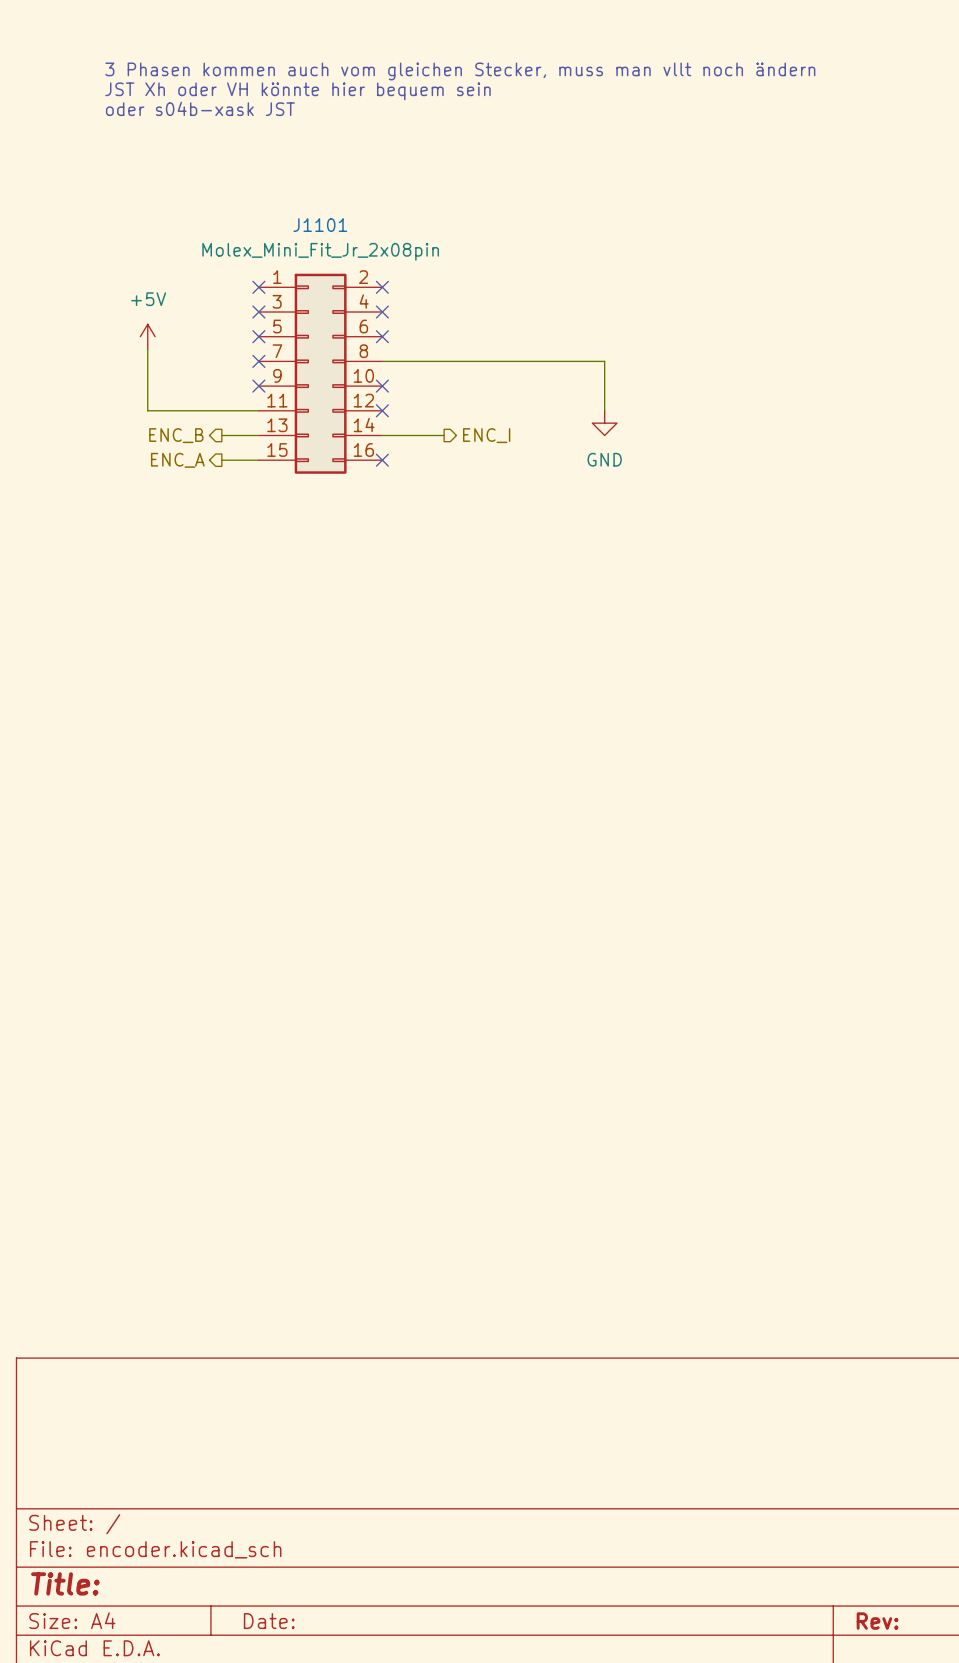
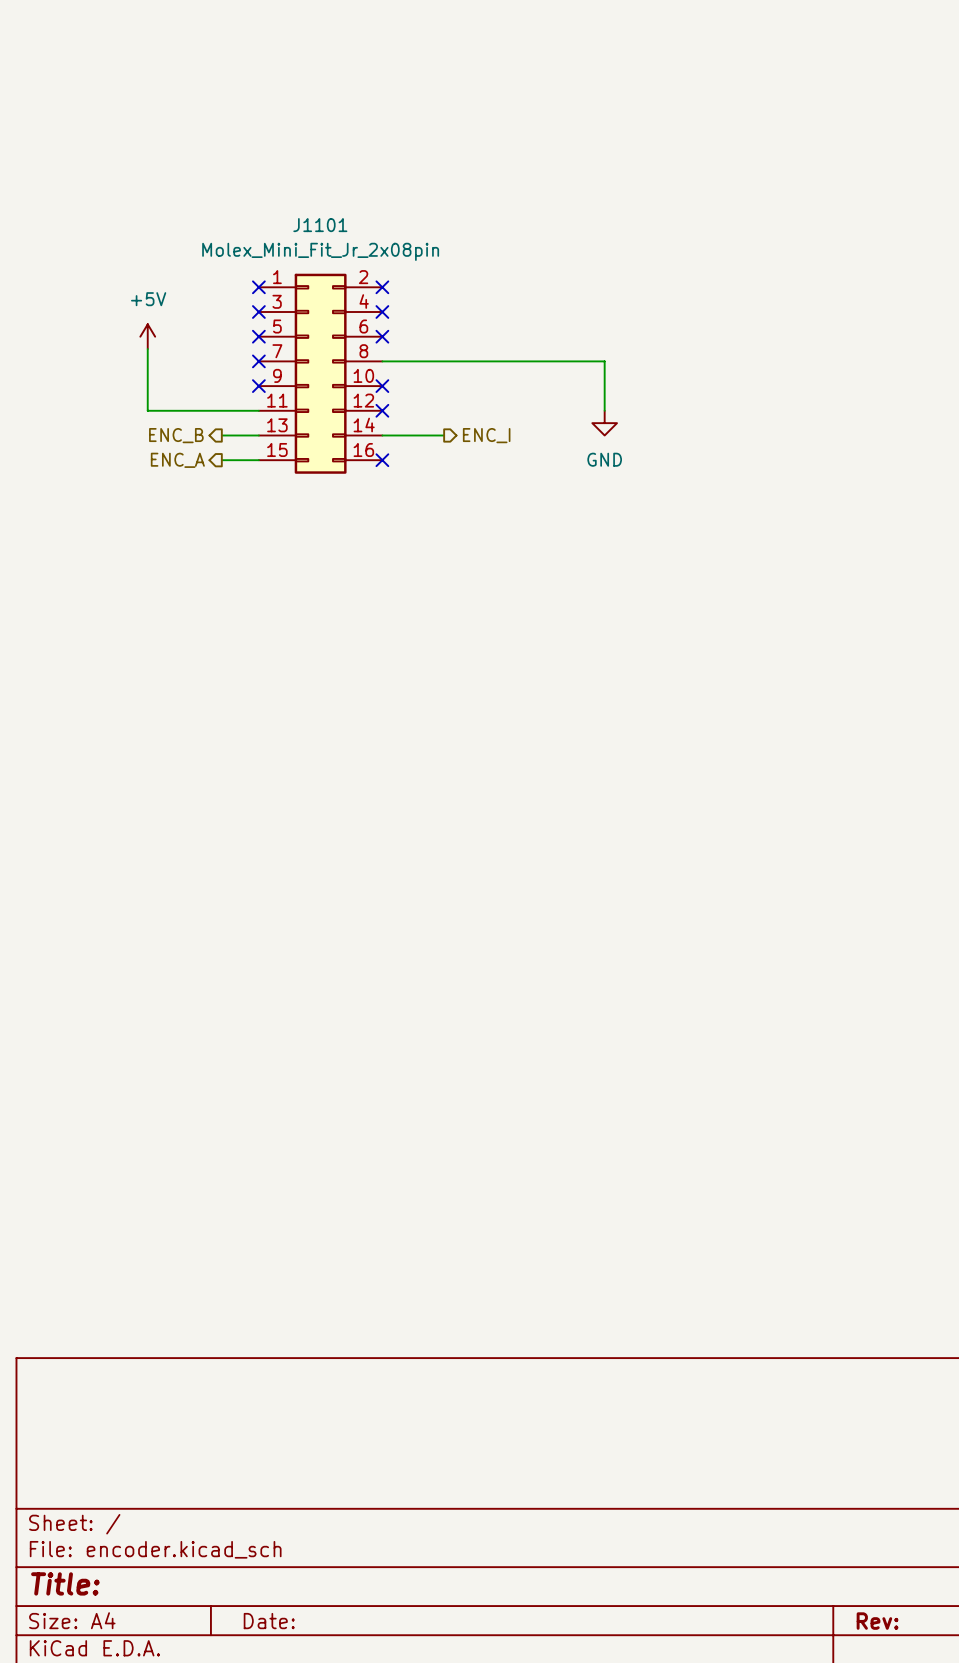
text: 3 Phasen kommen auch vom gleichen Stecker, muss man vllt noch ändern (460, 71) -> none
text: JST Xh oder VH könnte hier bequem sein (298, 91) -> none
text: oder s04b-xask JST (200, 108) -> none

